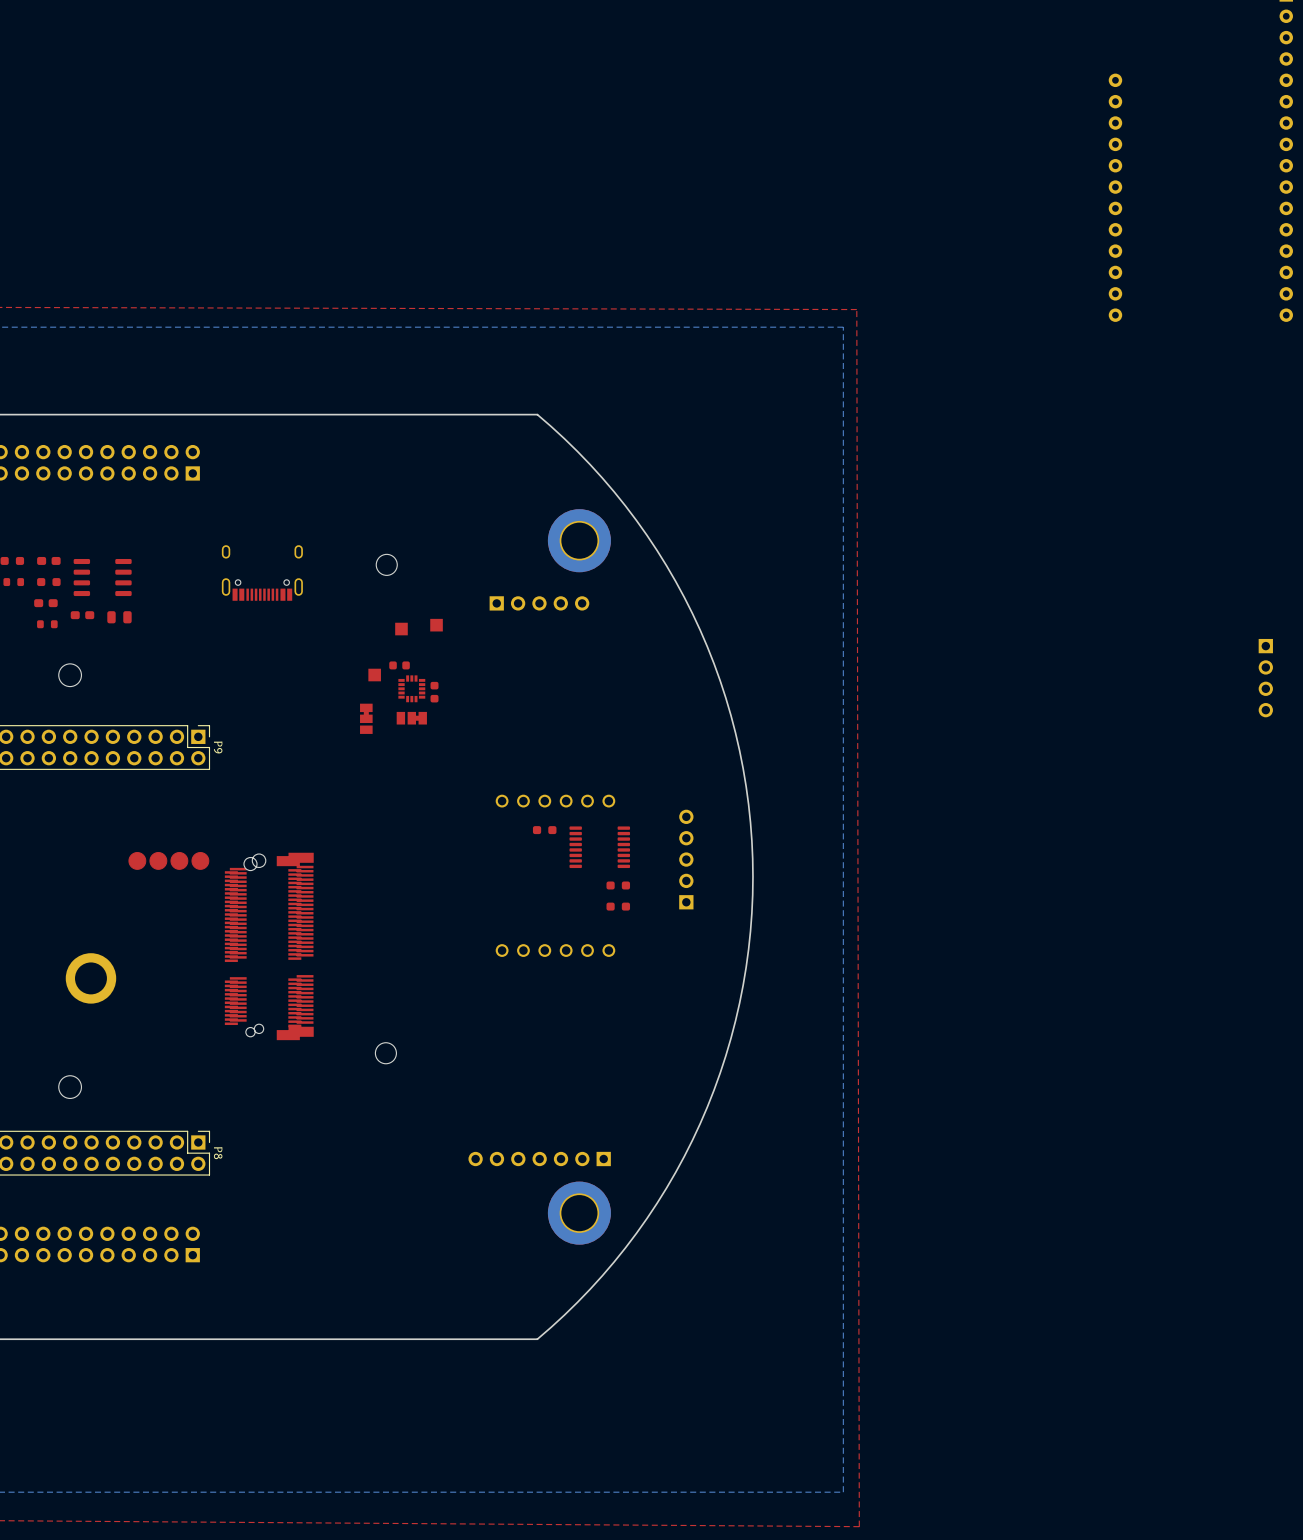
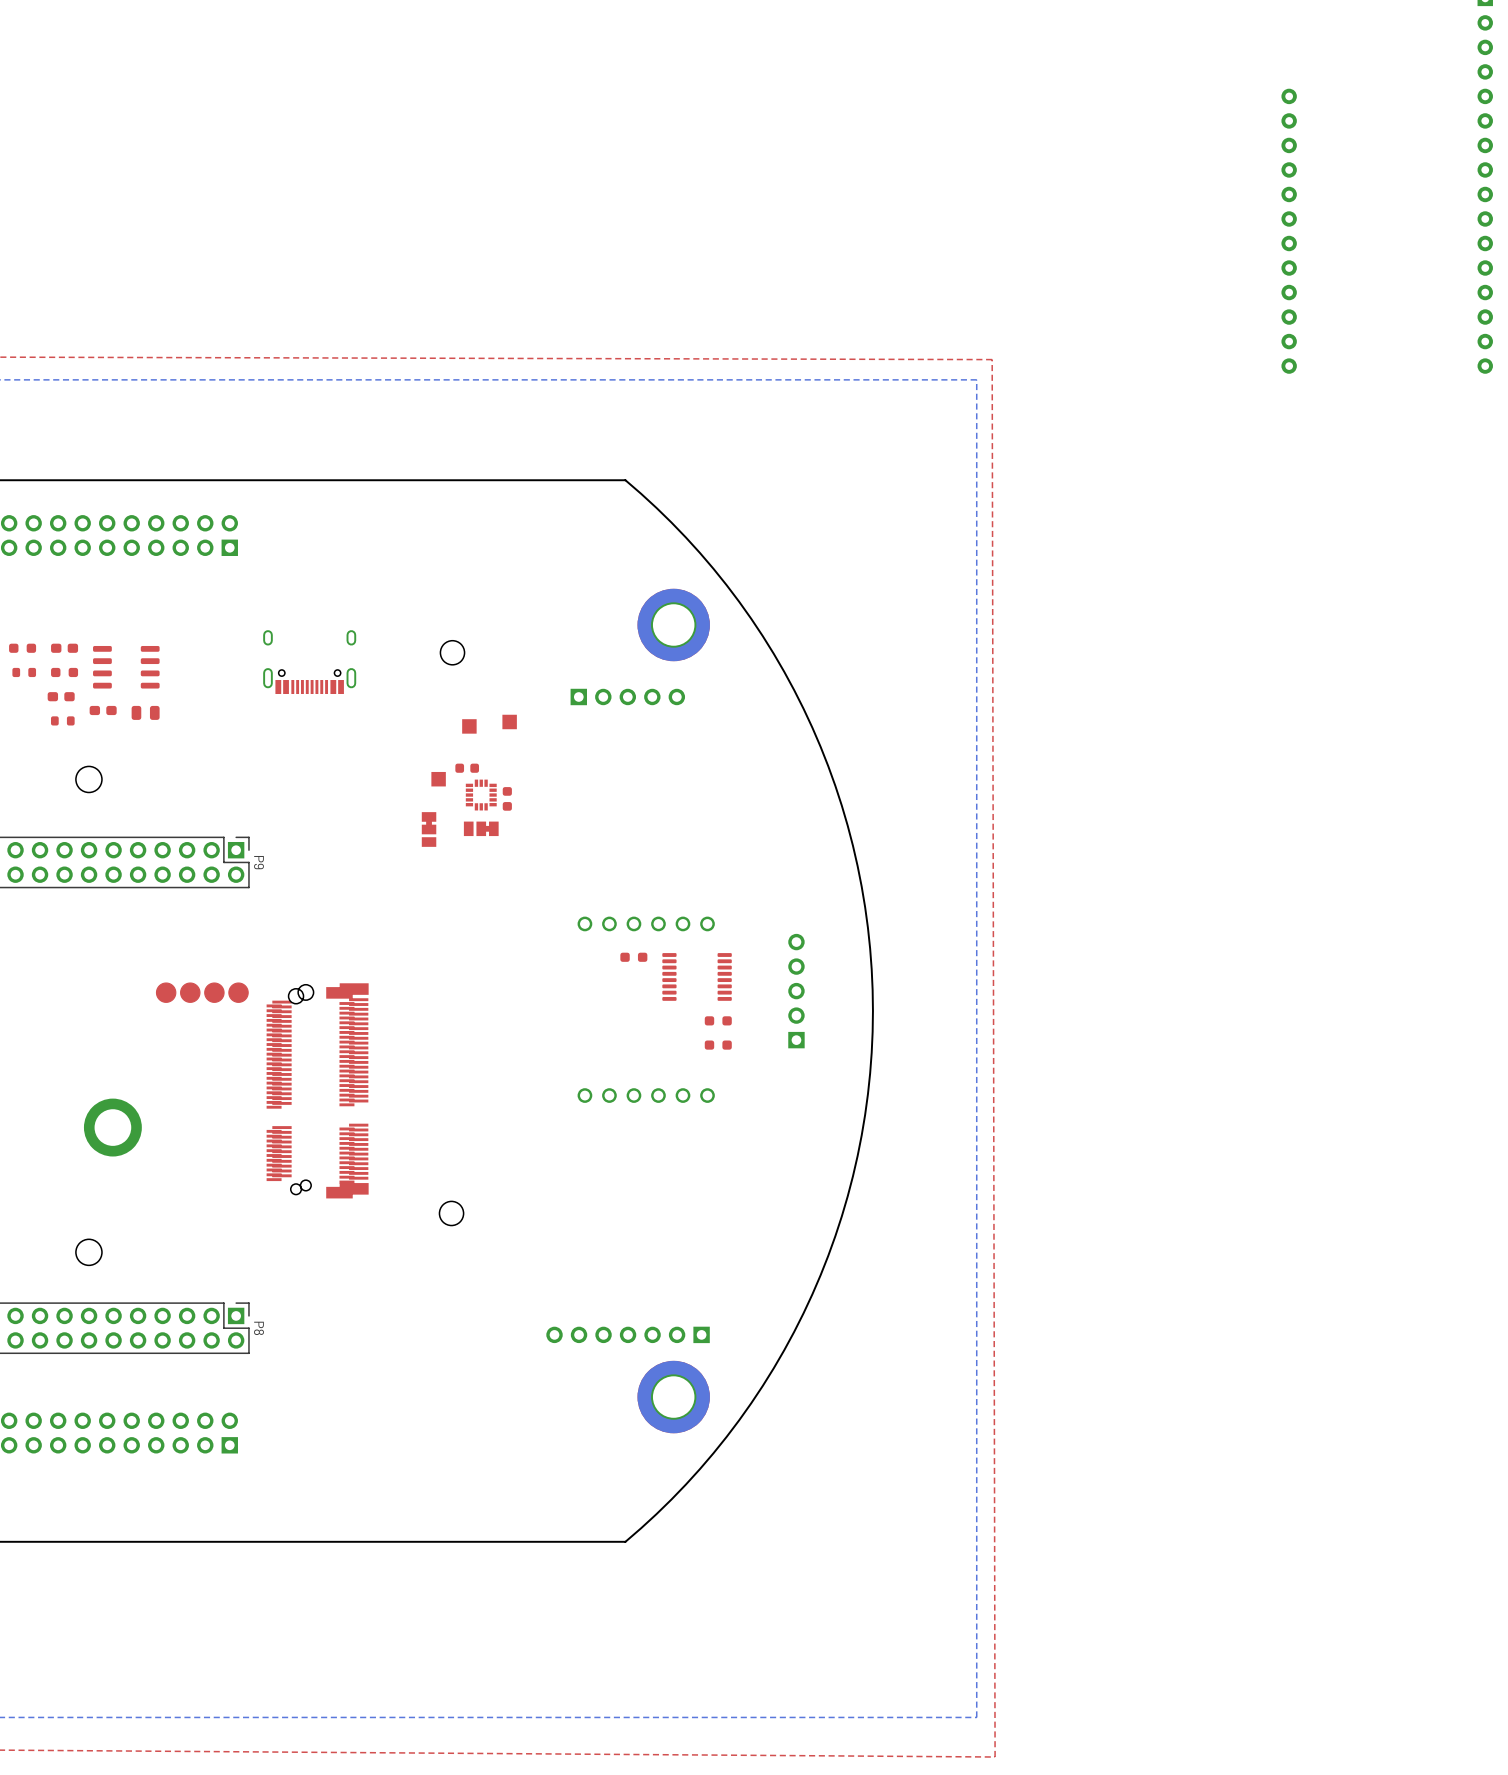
part: (1265, 678) -> none

